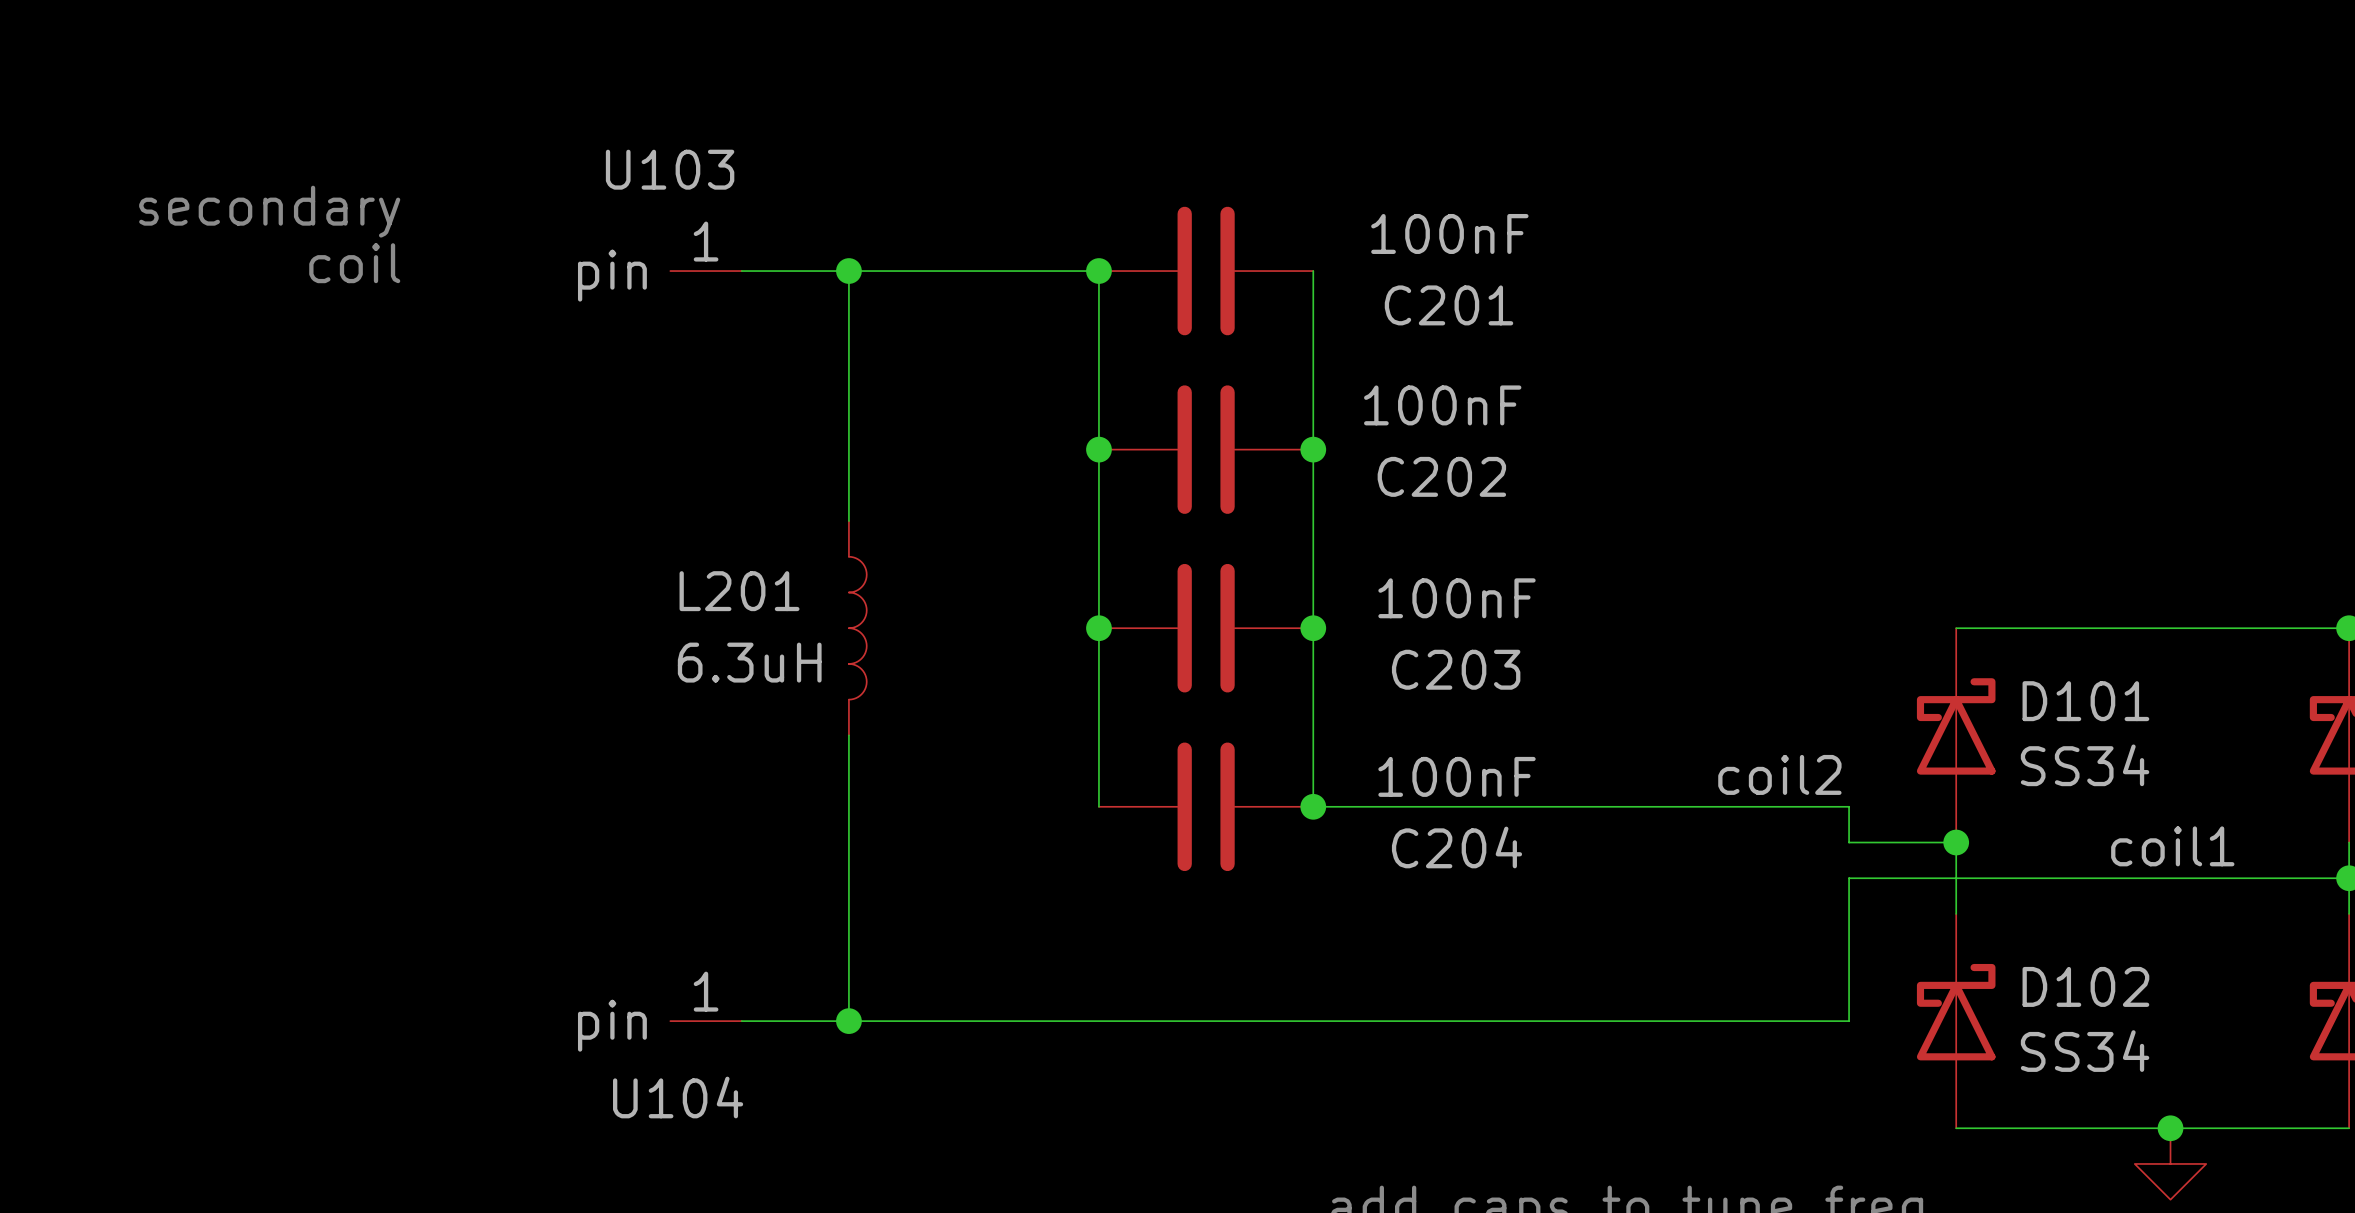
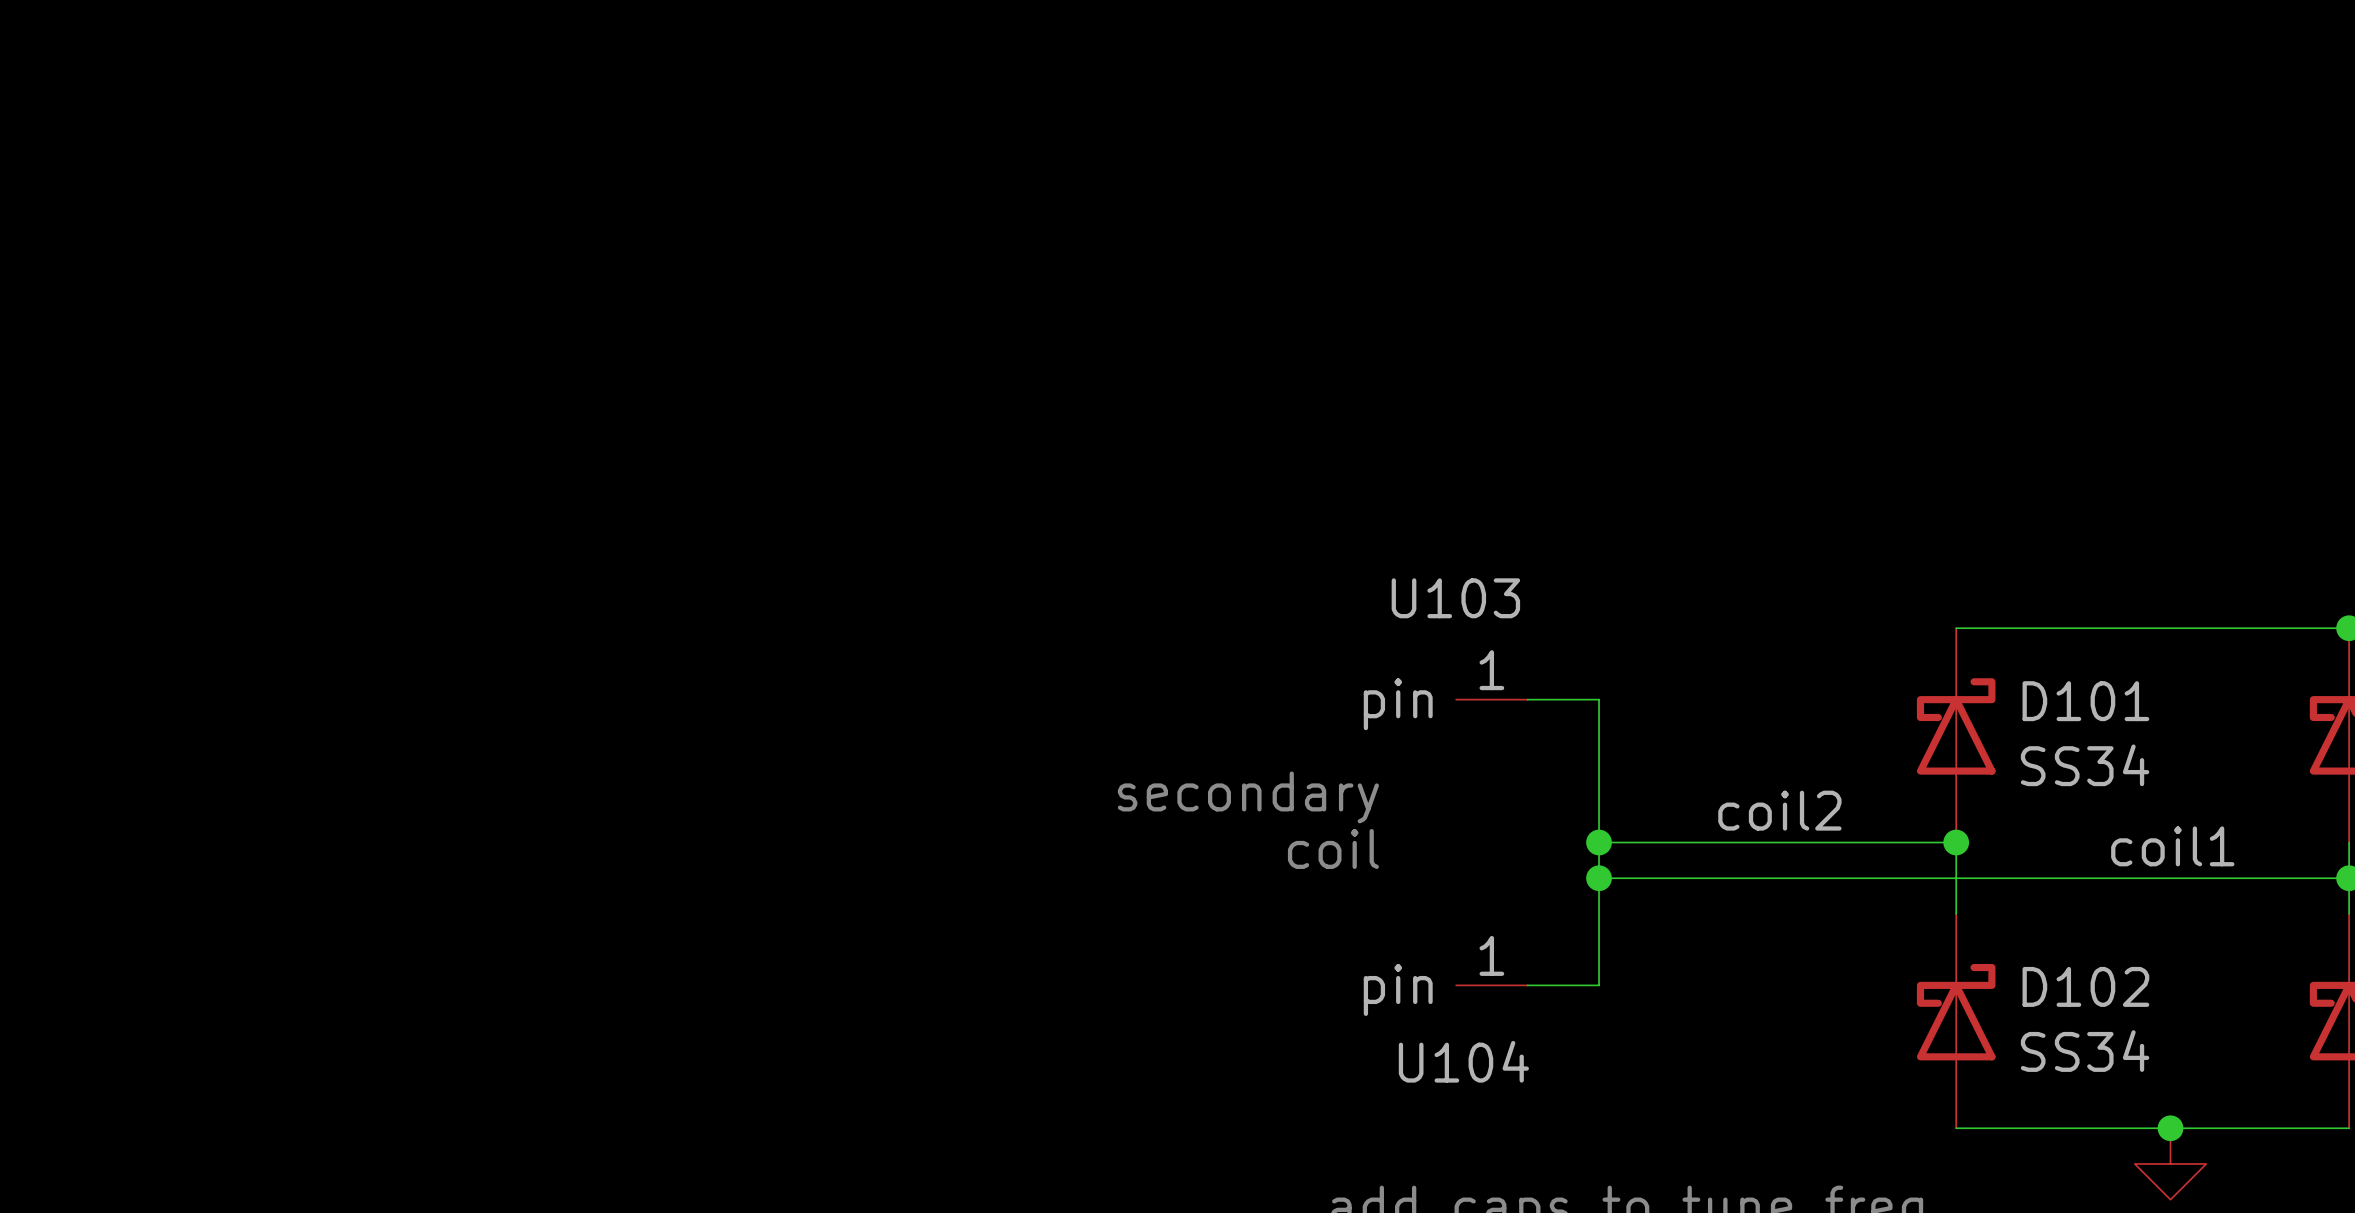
text: secondary (269, 211) -> none
text: coil (354, 263) -> none
U103 position: (706, 271) -> (1491, 699)
wire: (741, 271) (1098, 271) (1098, 806) -> none
wire: (848, 271) (848, 521) -> none
junction: (848, 271) -> none
junction: (1098, 271) -> none
C201: 100nF (1206, 271) -> none
wire: (1313, 271) (1313, 806) (1849, 806) (1849, 842) -> (1599, 842) (1849, 842)
junction: (1098, 449) -> none
C202: 100nF (1206, 449) -> none
junction: (1313, 449) -> none
L201: 6.3uH (857, 628) -> none
junction: (1098, 628) -> none
C203: 100nF (1206, 628) -> none
junction: (1313, 628) -> none
wire: none -> (1527, 699) (1599, 699) (1599, 985) (1527, 985)
wire: (848, 735) (848, 1021) -> none
label position: coil2 (1779, 774) -> coil2 (1779, 810)
text: none -> secondary (1248, 797)
C204: 100nF (1206, 806) -> none
junction: (1313, 806) -> none
junction: none -> (1599, 842)
text: none -> coil (1333, 848)
junction: none -> (1599, 878)
wire: (1849, 878) (1849, 1021) (741, 1021) -> (1849, 878) (1599, 878)
U104 position: (706, 1021) -> (1491, 985)
junction: (848, 1021) -> none

